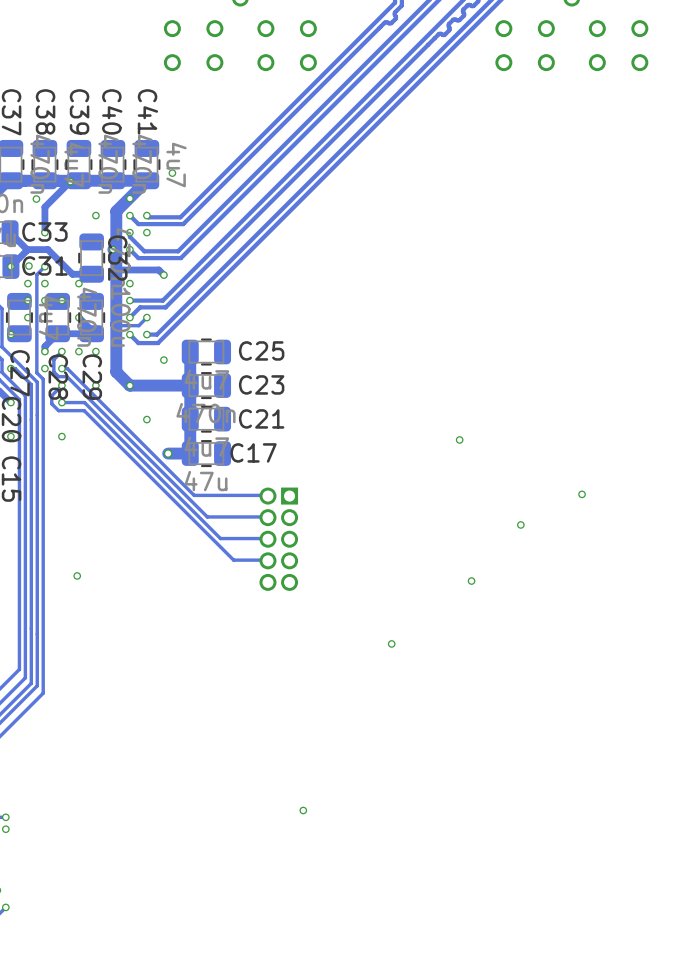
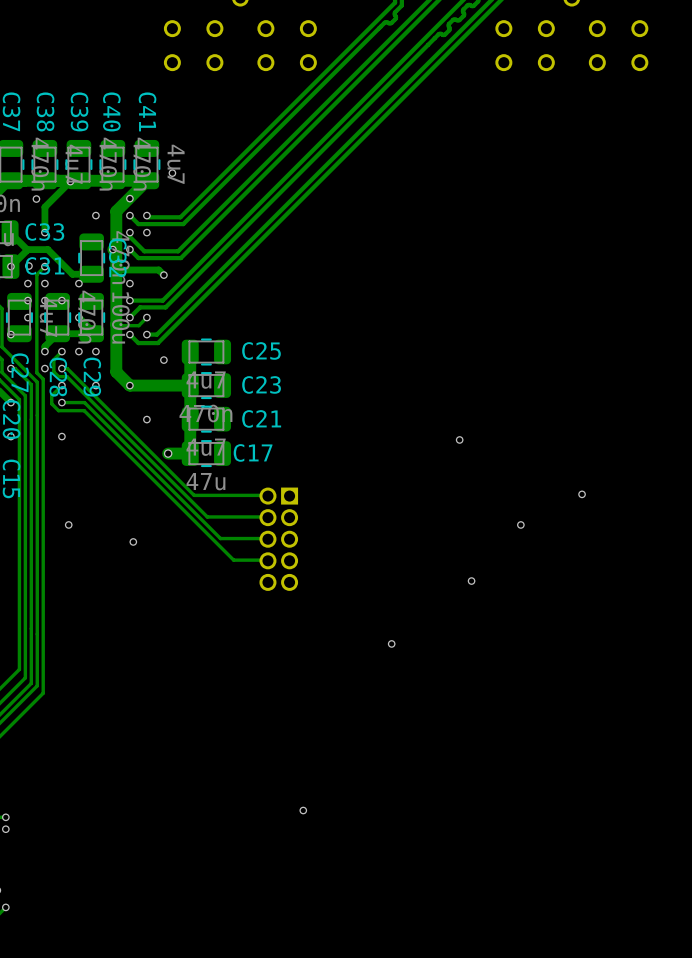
via: none -> (68, 524)
via: none -> (133, 541)
via: (77, 575) -> none

